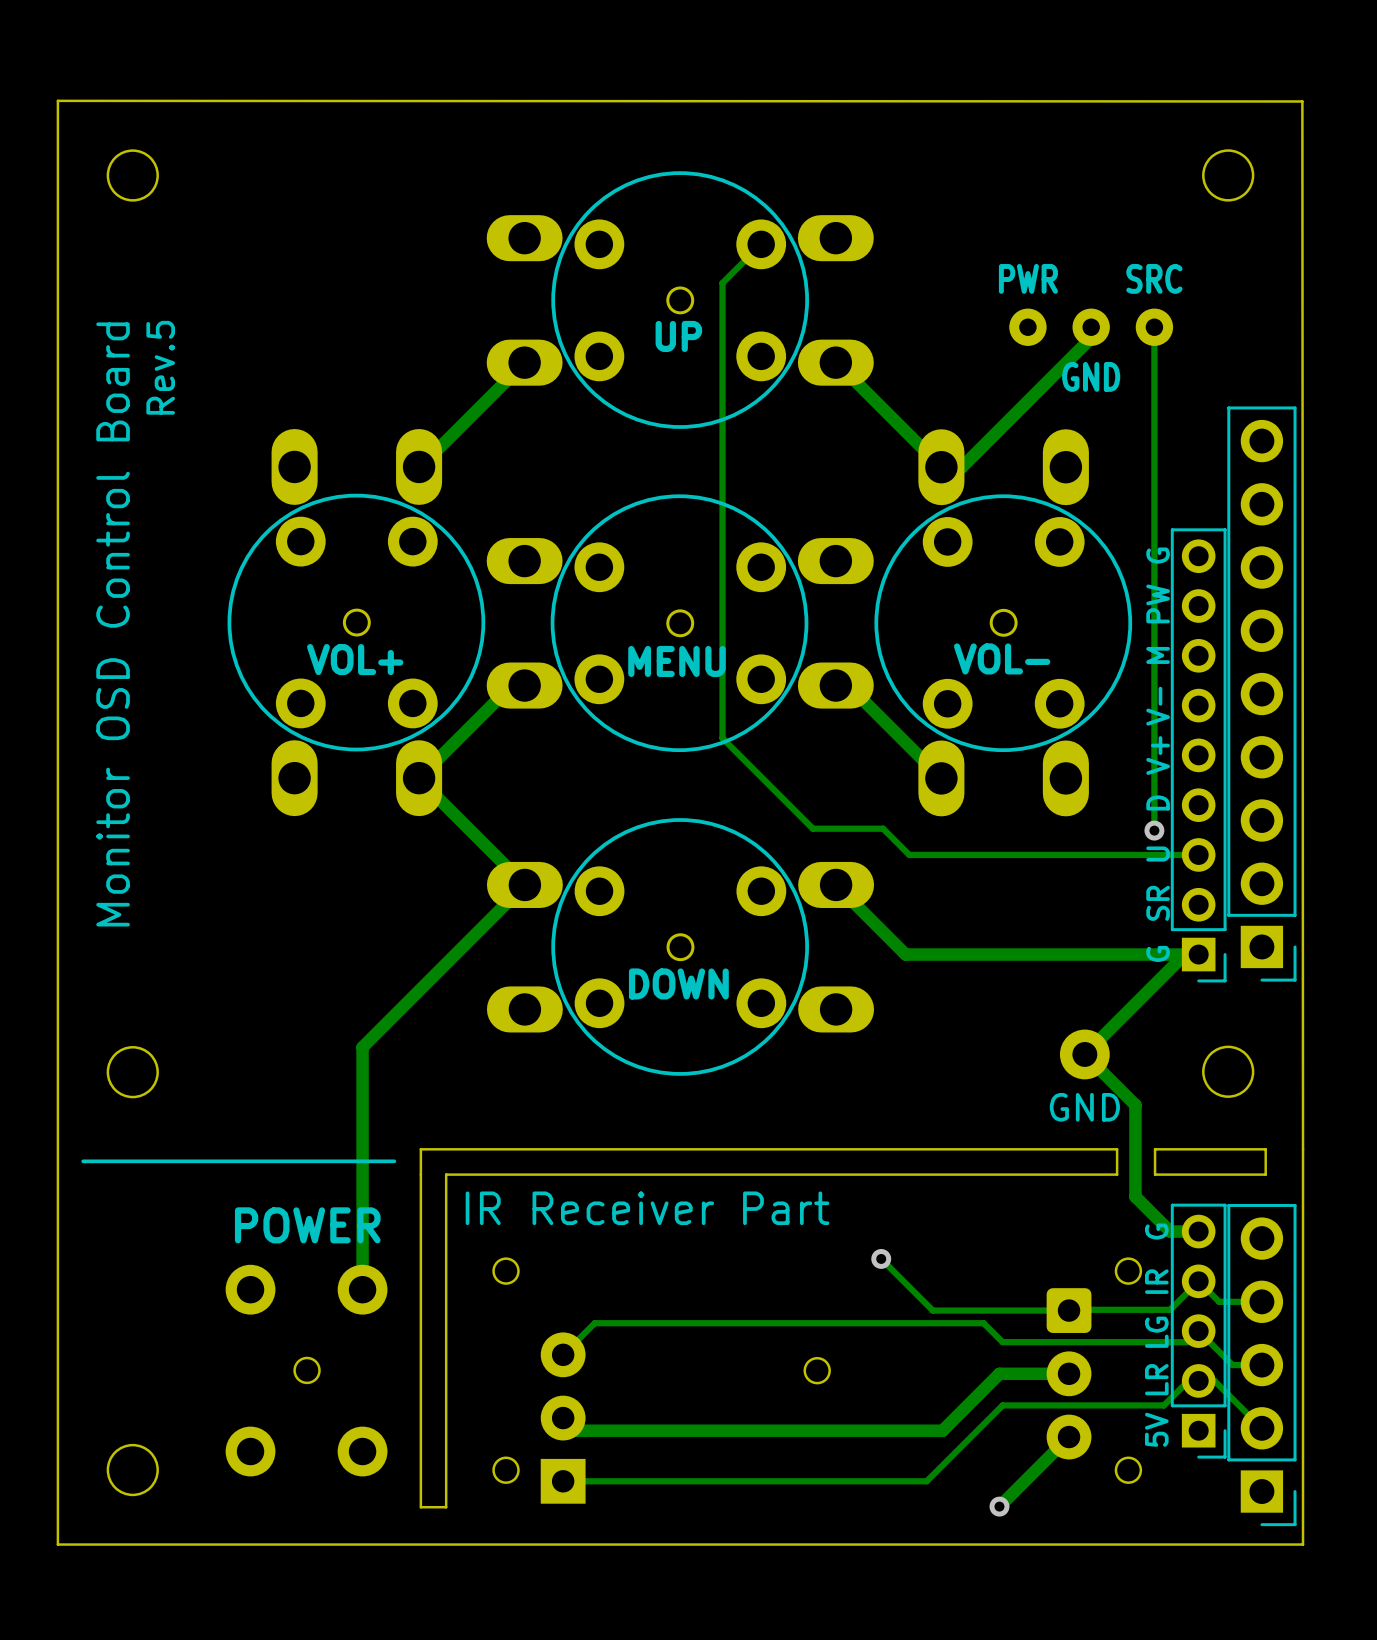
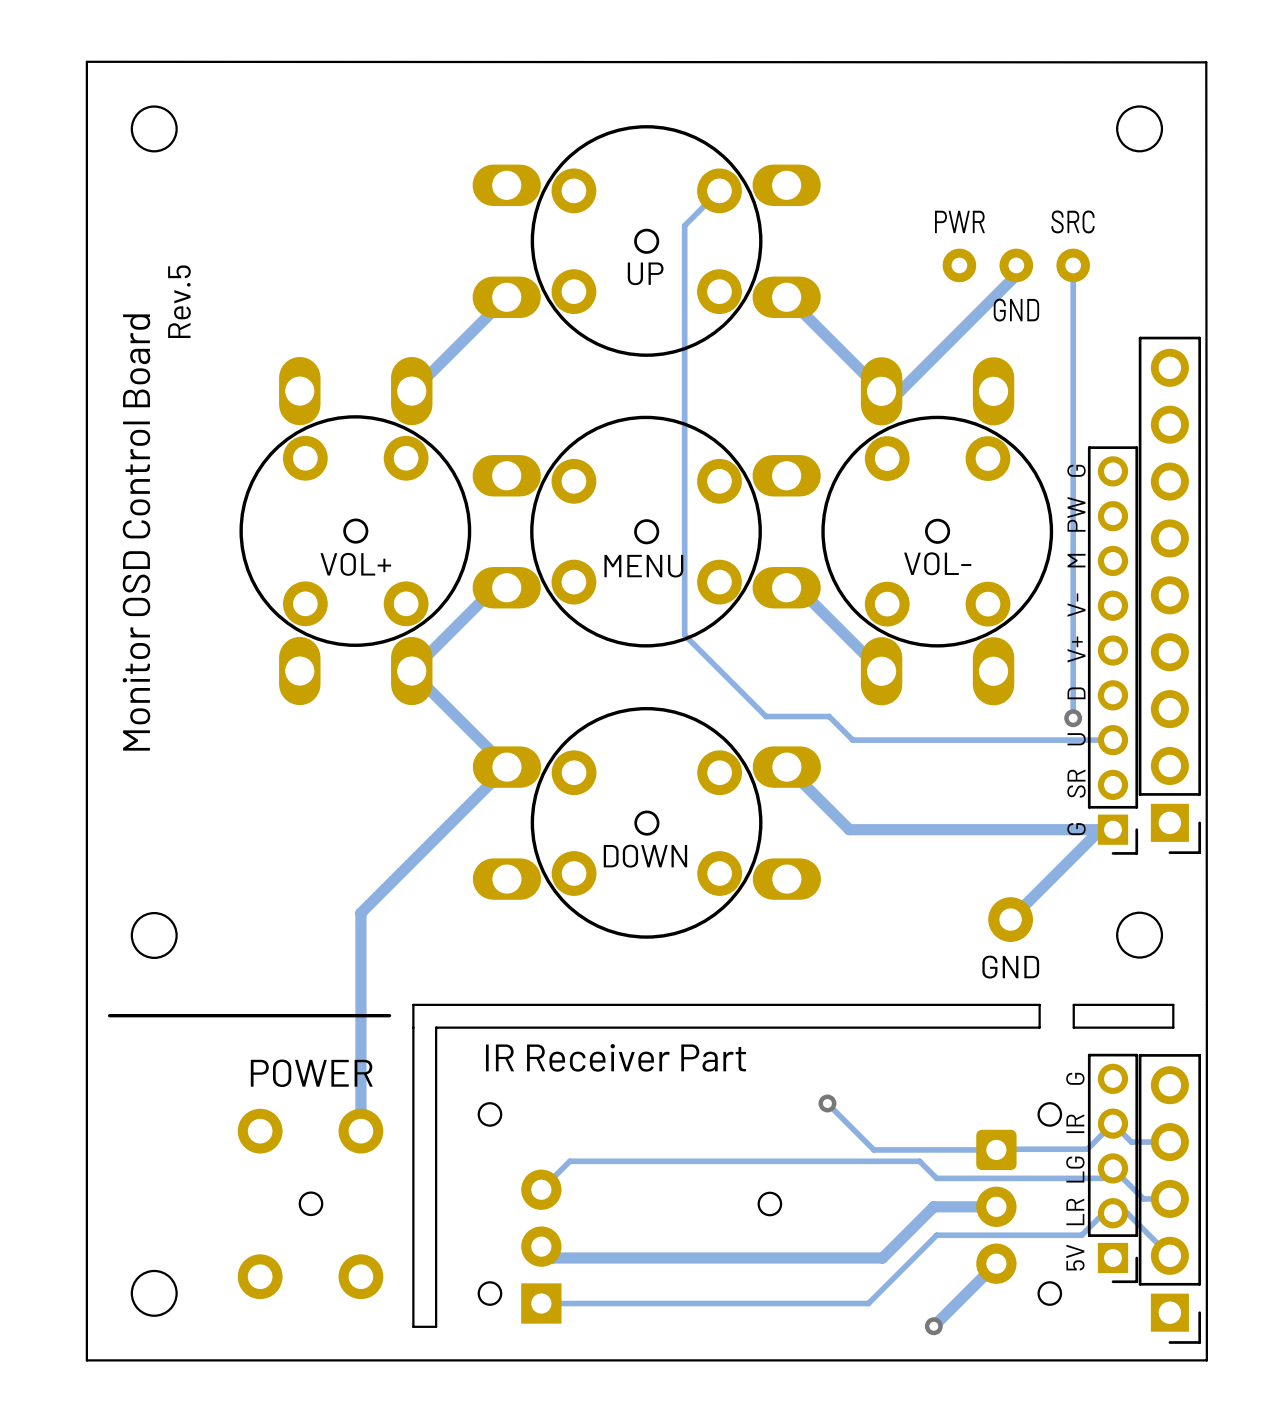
track: (1084, 1054) (1135, 1105) (1135, 1196) (1170, 1231) (1198, 1231) -> none

